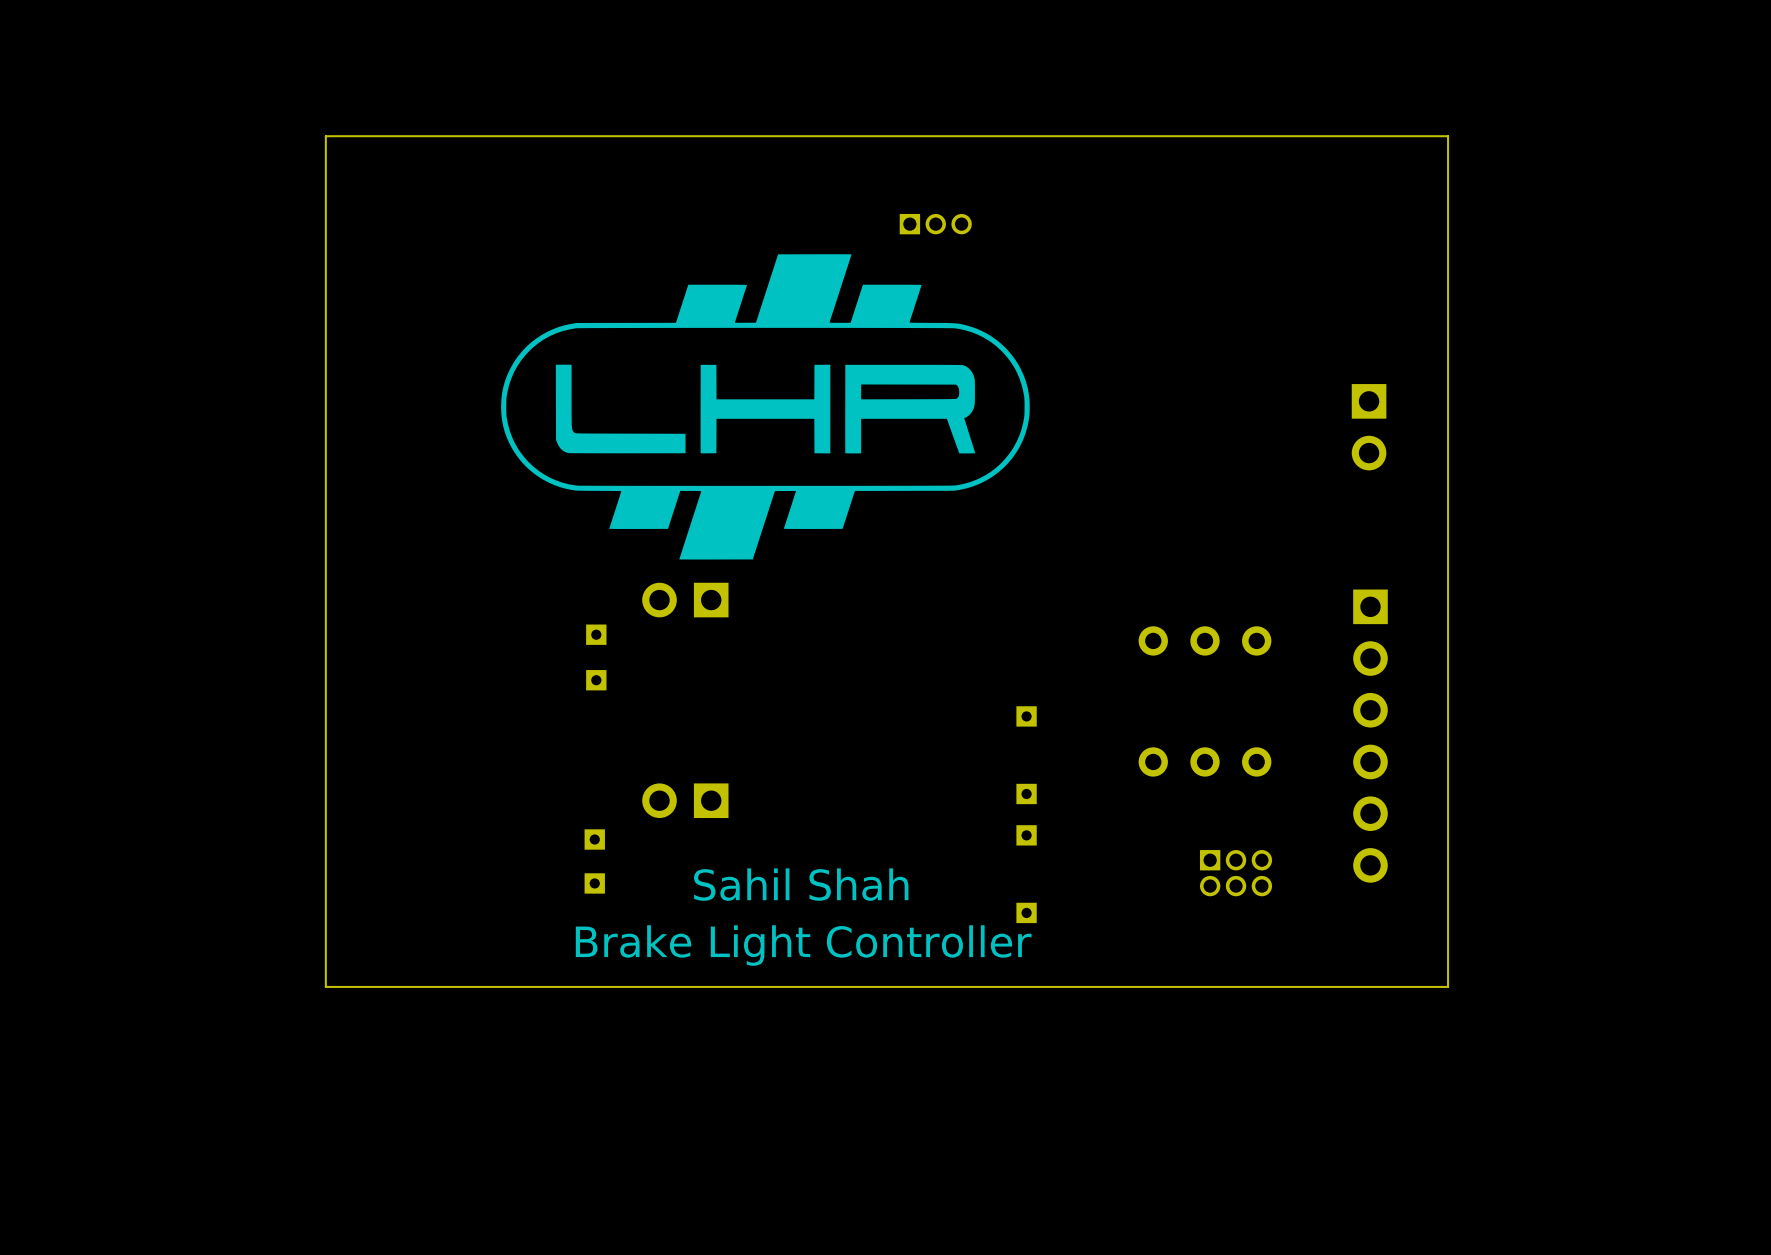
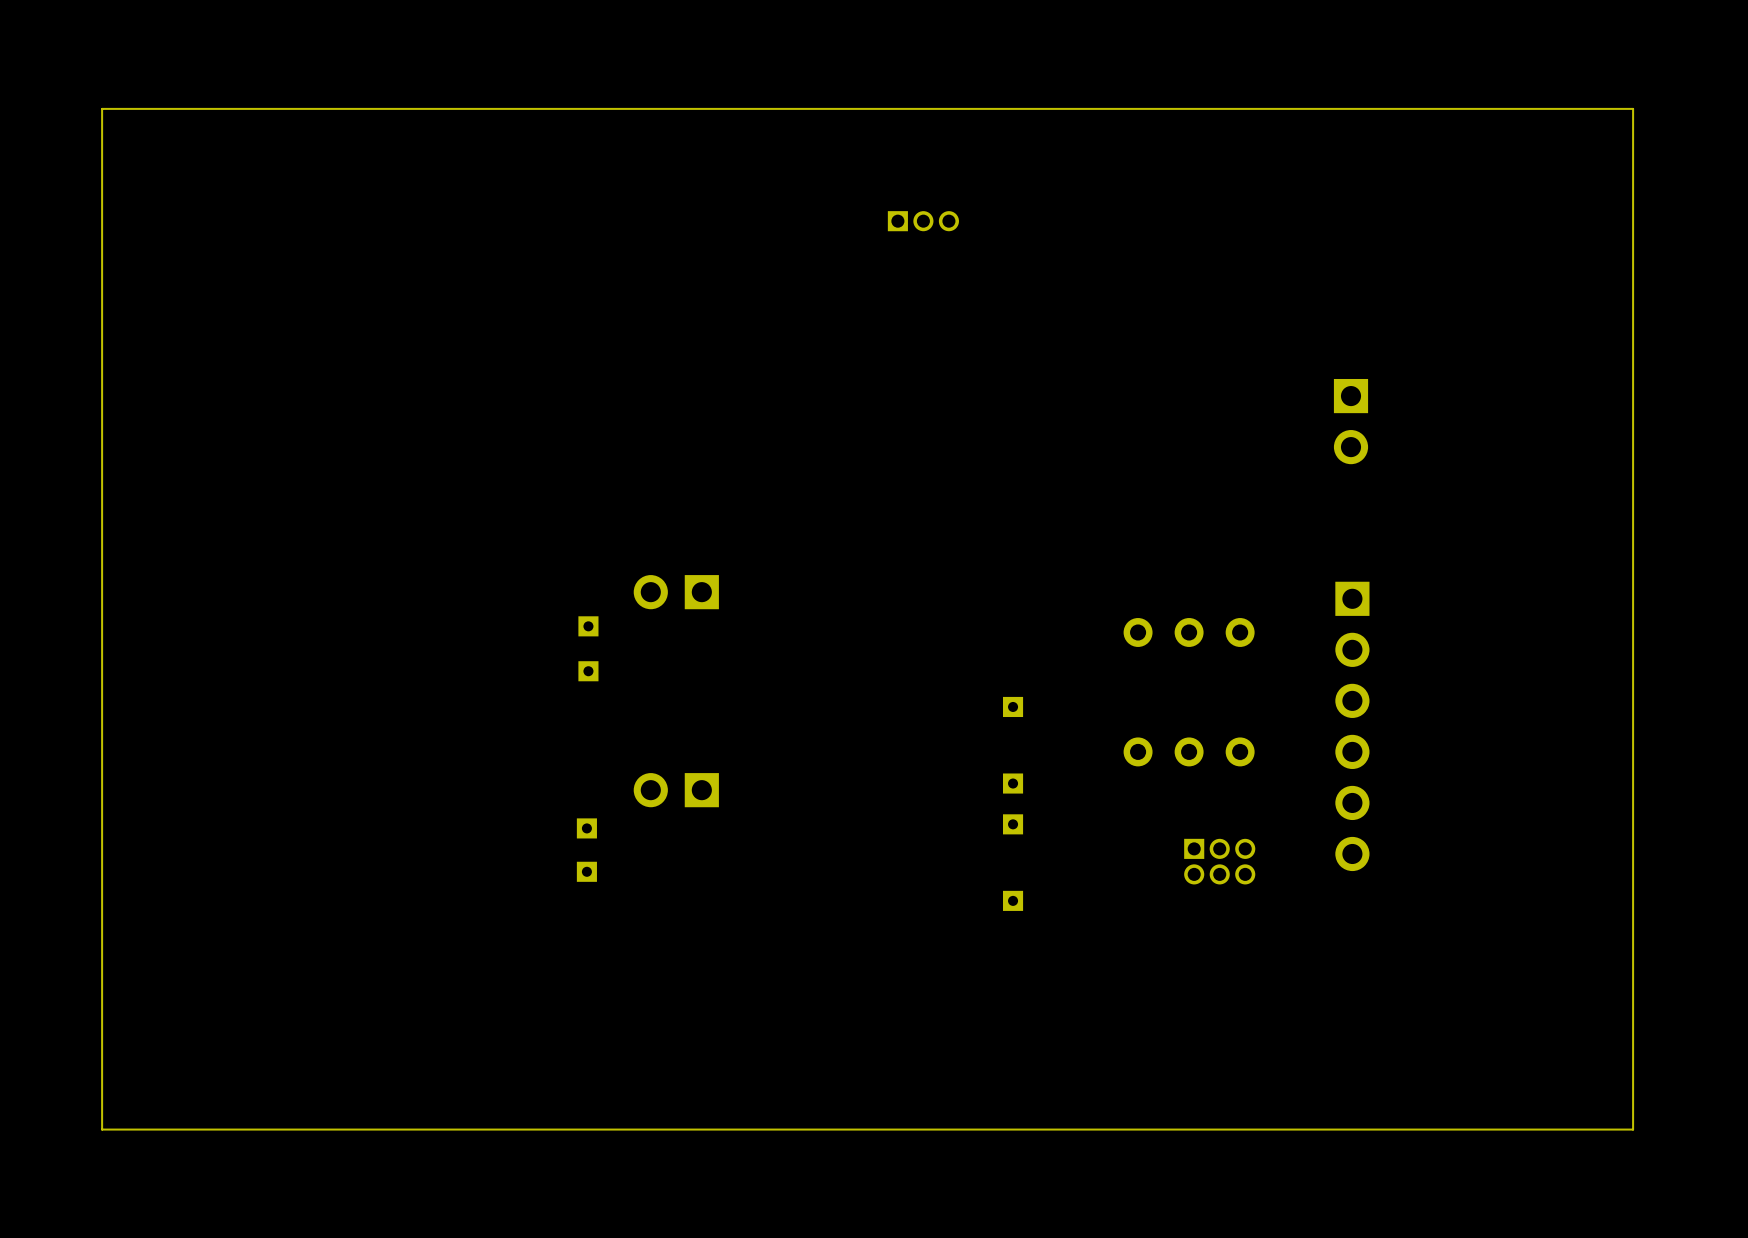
board edge: (1448, 136) (325, 136) (325, 986) (1448, 986) (1448, 136) -> (1633, 108) (1633, 1129) (102, 1129) (102, 108) (1633, 108)
drawing: [501, 254, 1030, 560] -> none
text: Sahil Shah (801, 884) -> none
text: Brake Light Controller (803, 945) -> none

